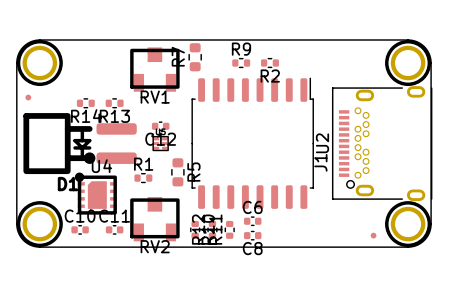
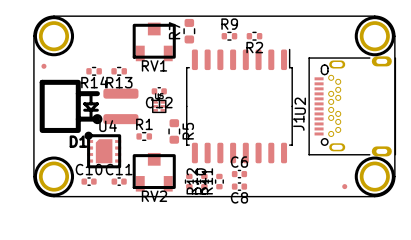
J1 footprint: [331, 86, 433, 201] -> [308, 56, 397, 157]

